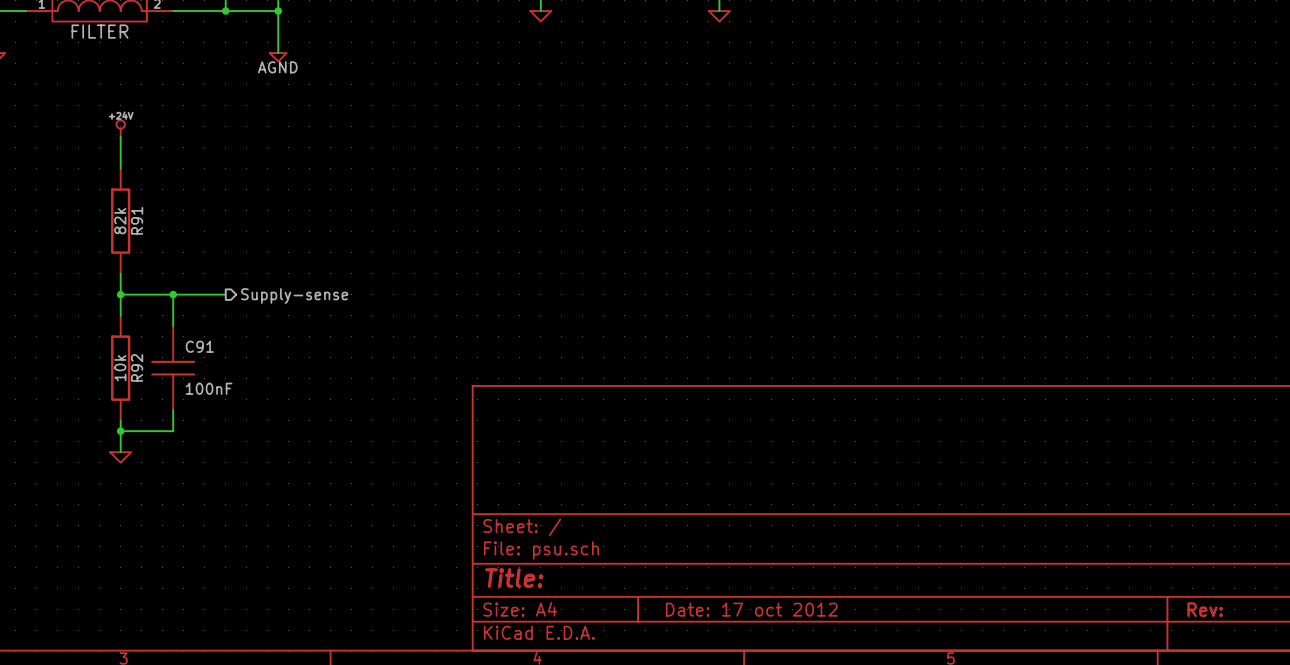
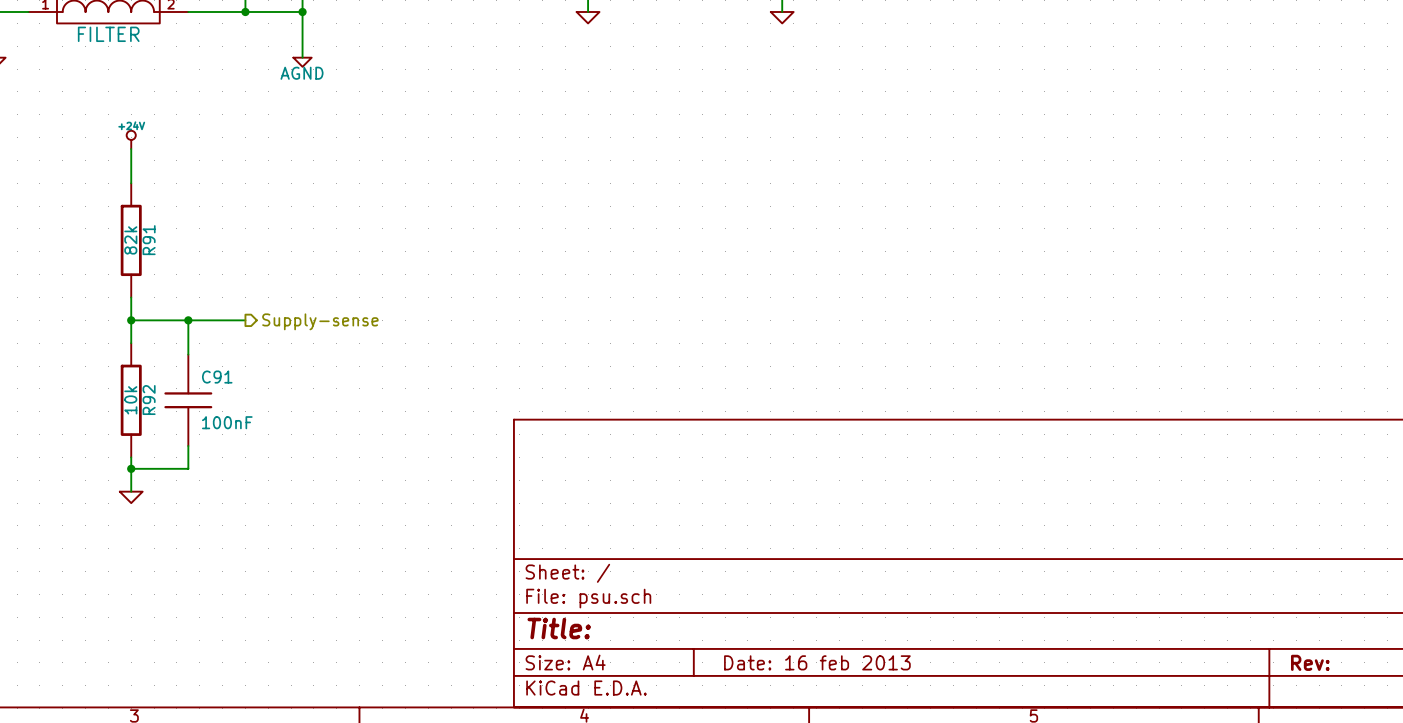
title block: Date: 17 oct 2012 (751, 609) -> Date: 16 feb 2013 (817, 662)

